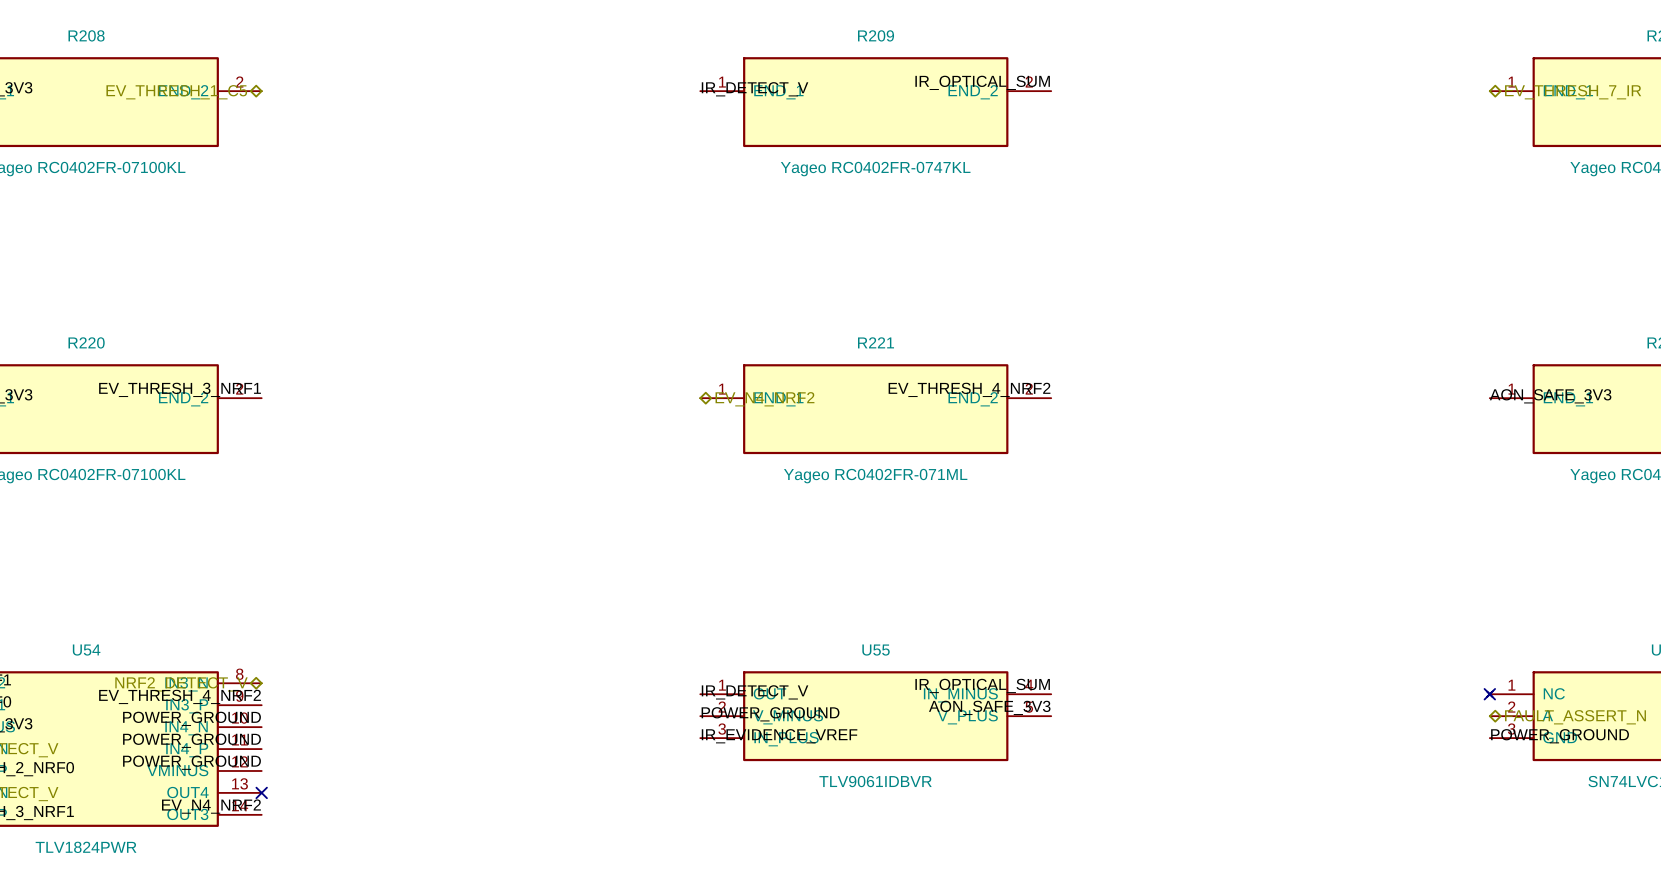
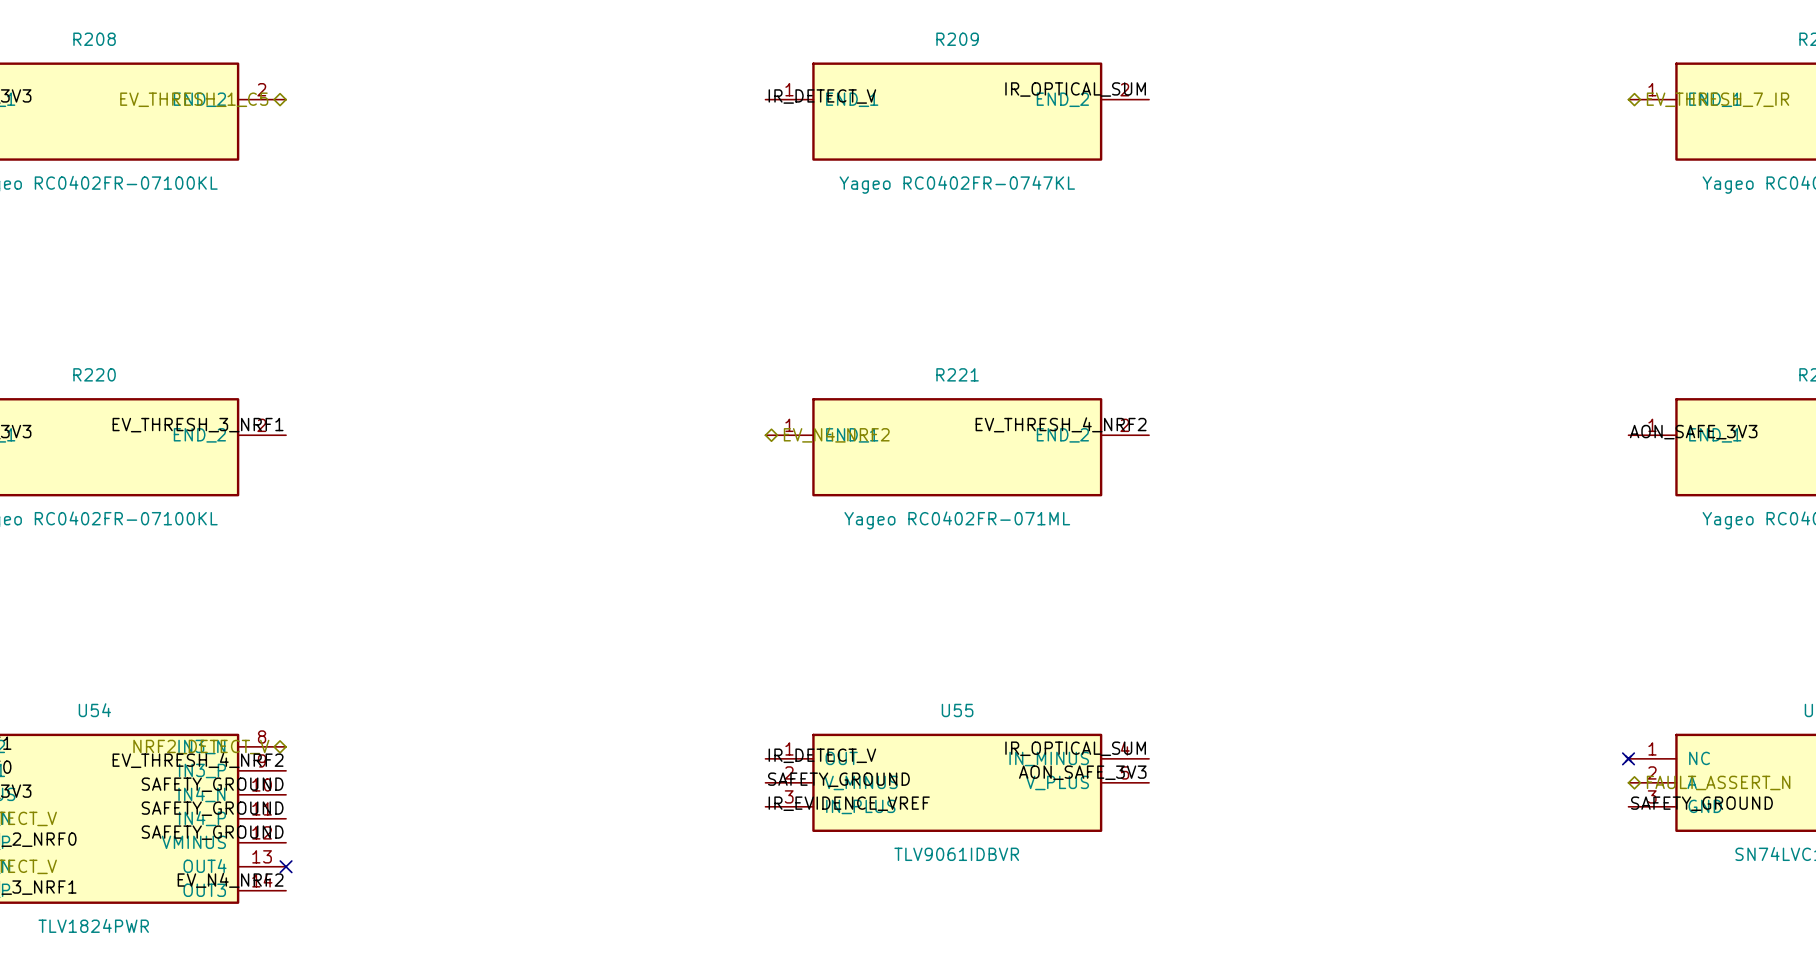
label: POWER_GROUND (770, 714) -> SAFETY_GROUND (838, 779)
label: POWER_GROUND (192, 718) -> SAFETY_GROUND (212, 784)
label: POWER_GROUND (1560, 736) -> SAFETY_GROUND (1701, 803)
label: POWER_GROUND (192, 740) -> SAFETY_GROUND (212, 808)
label: POWER_GROUND (192, 762) -> SAFETY_GROUND (212, 832)

